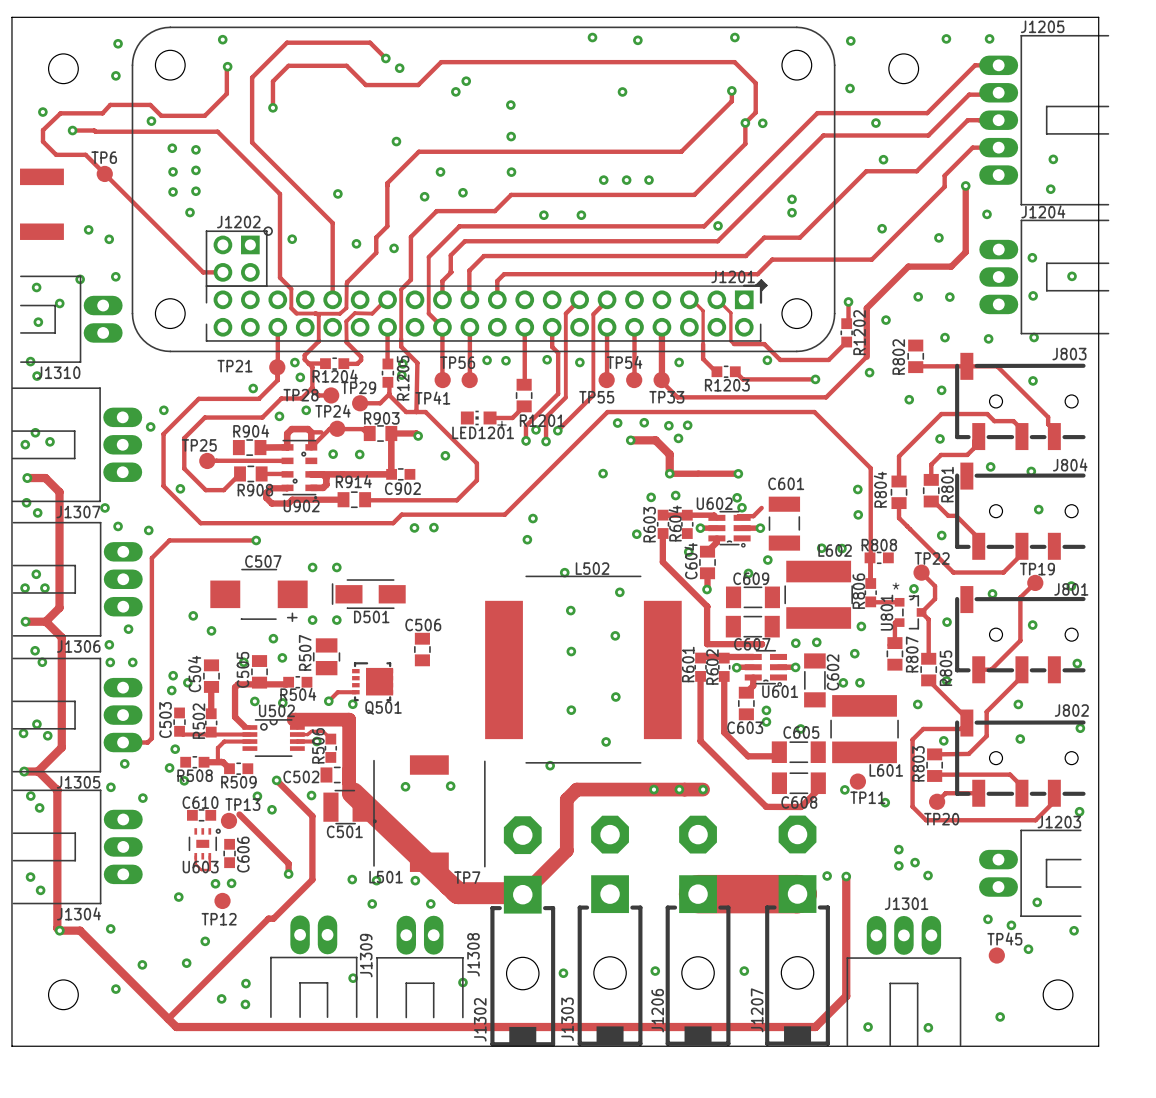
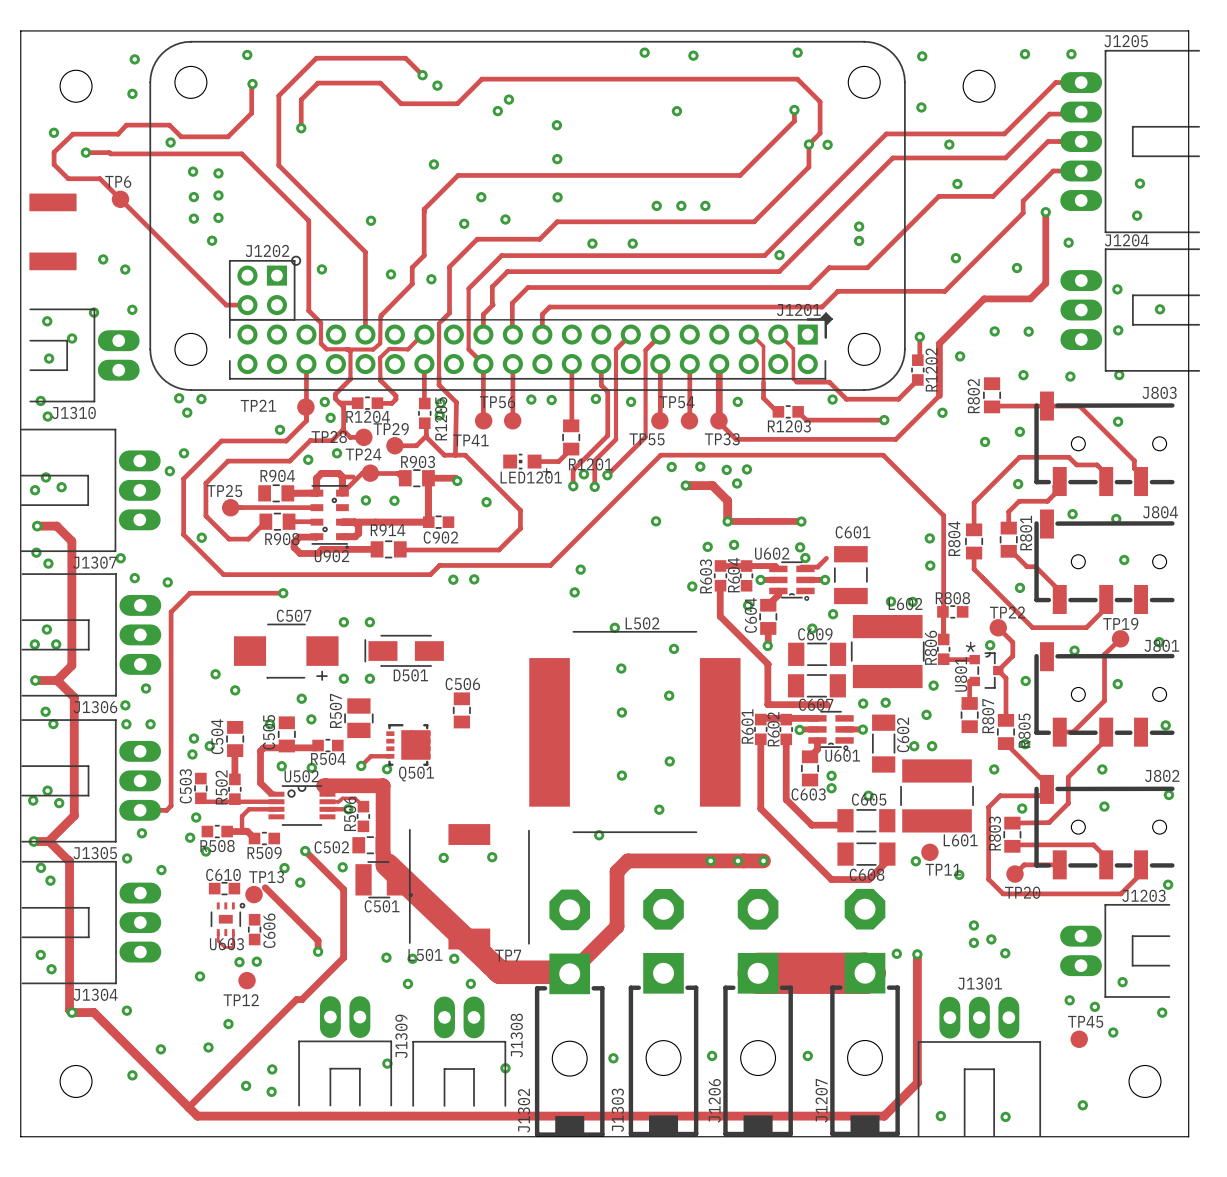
via: none -> (179, 398)
via: none -> (201, 399)
via: none -> (187, 412)

